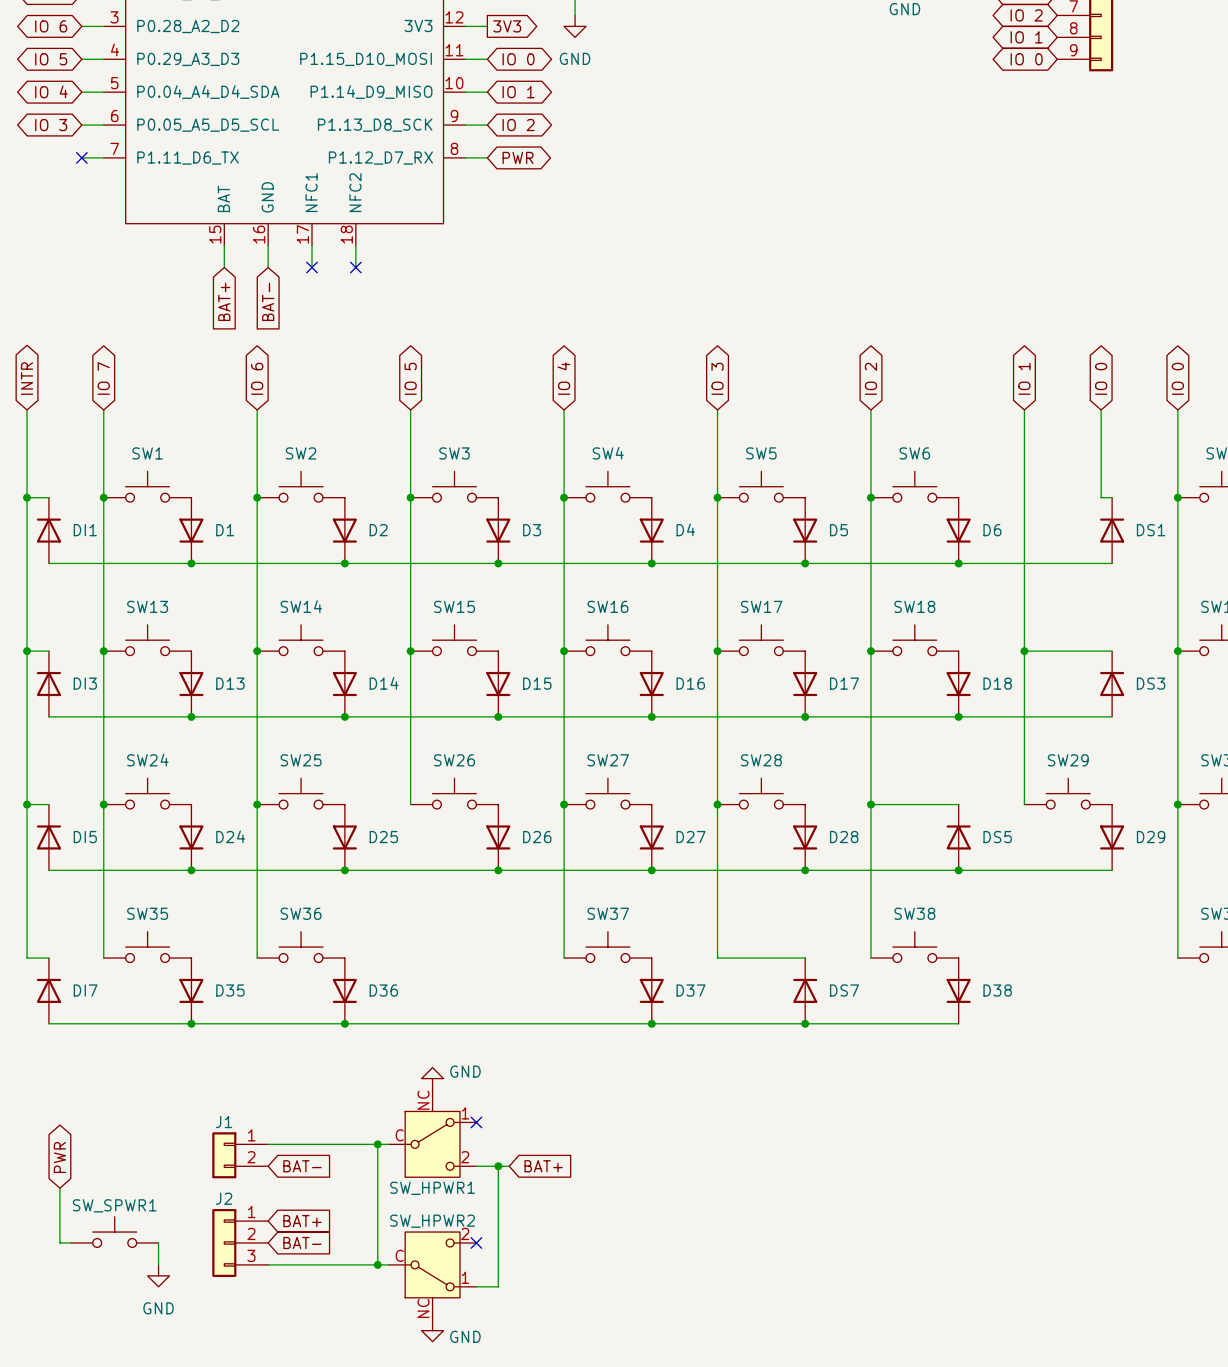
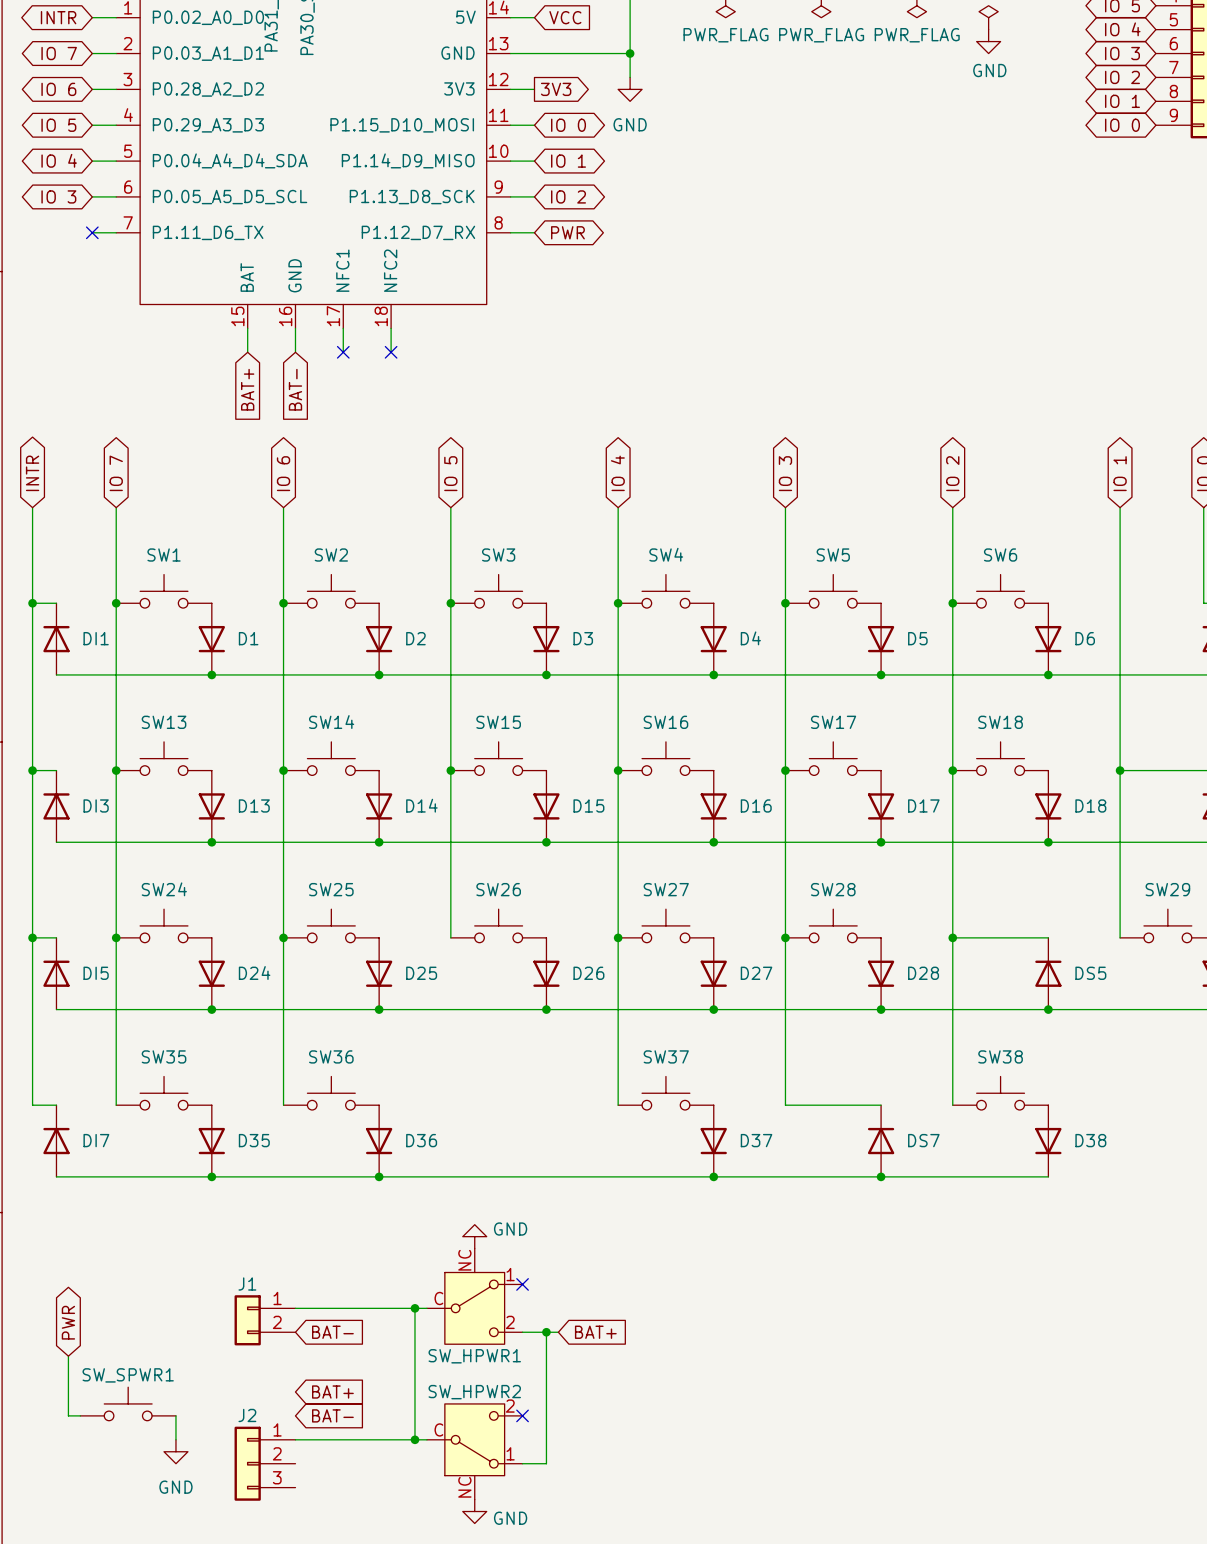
J2 position: (240, 1242) -> (265, 1463)

